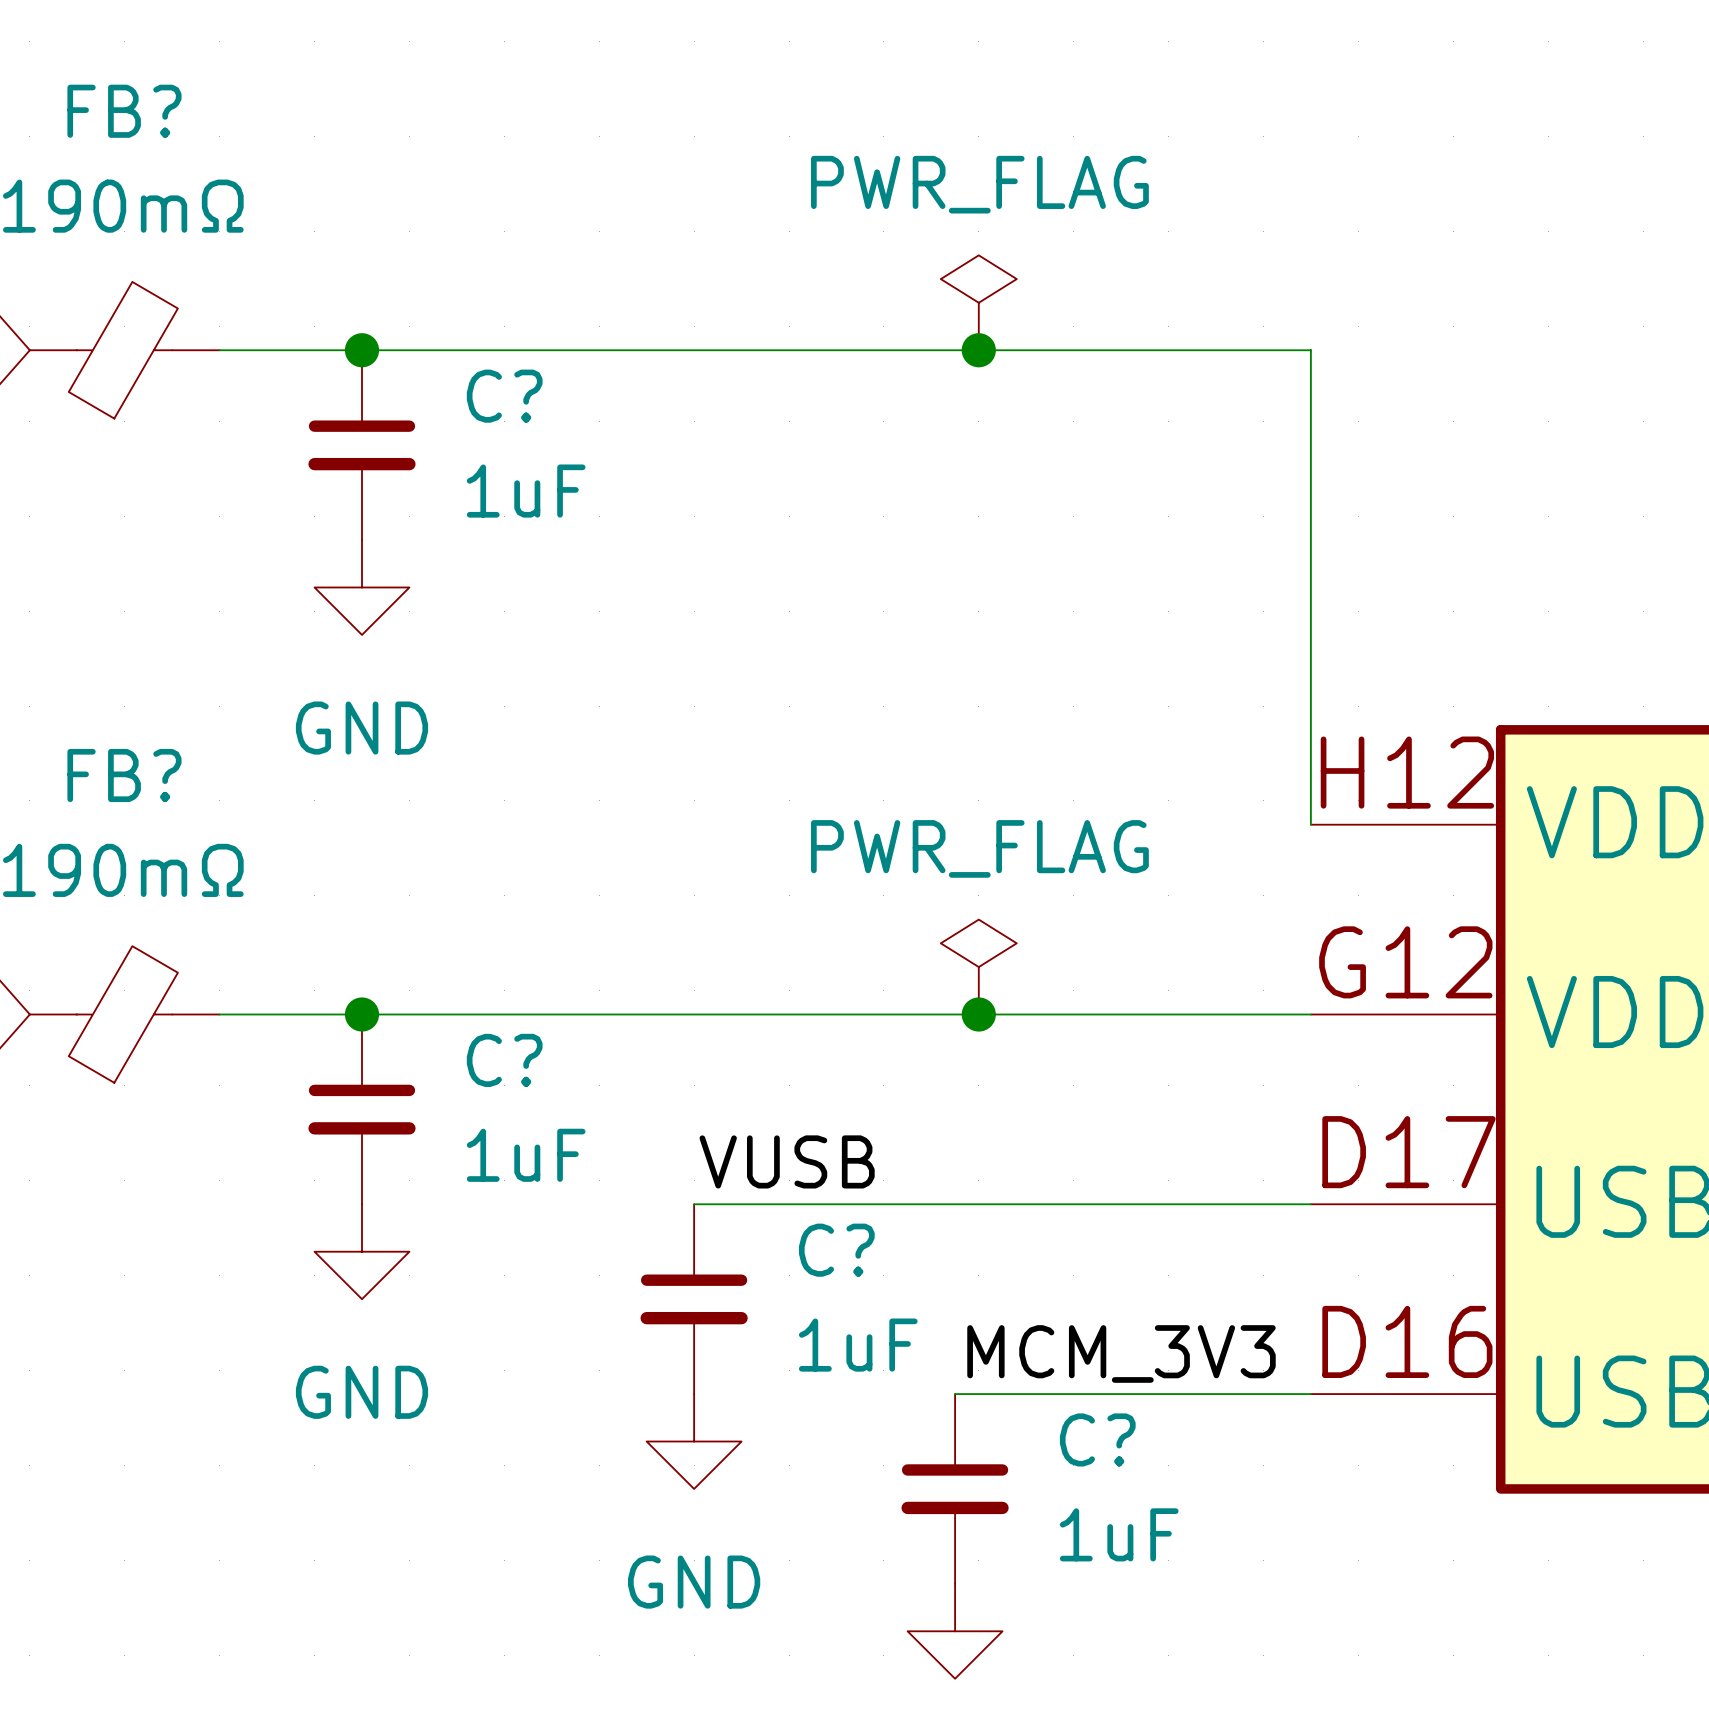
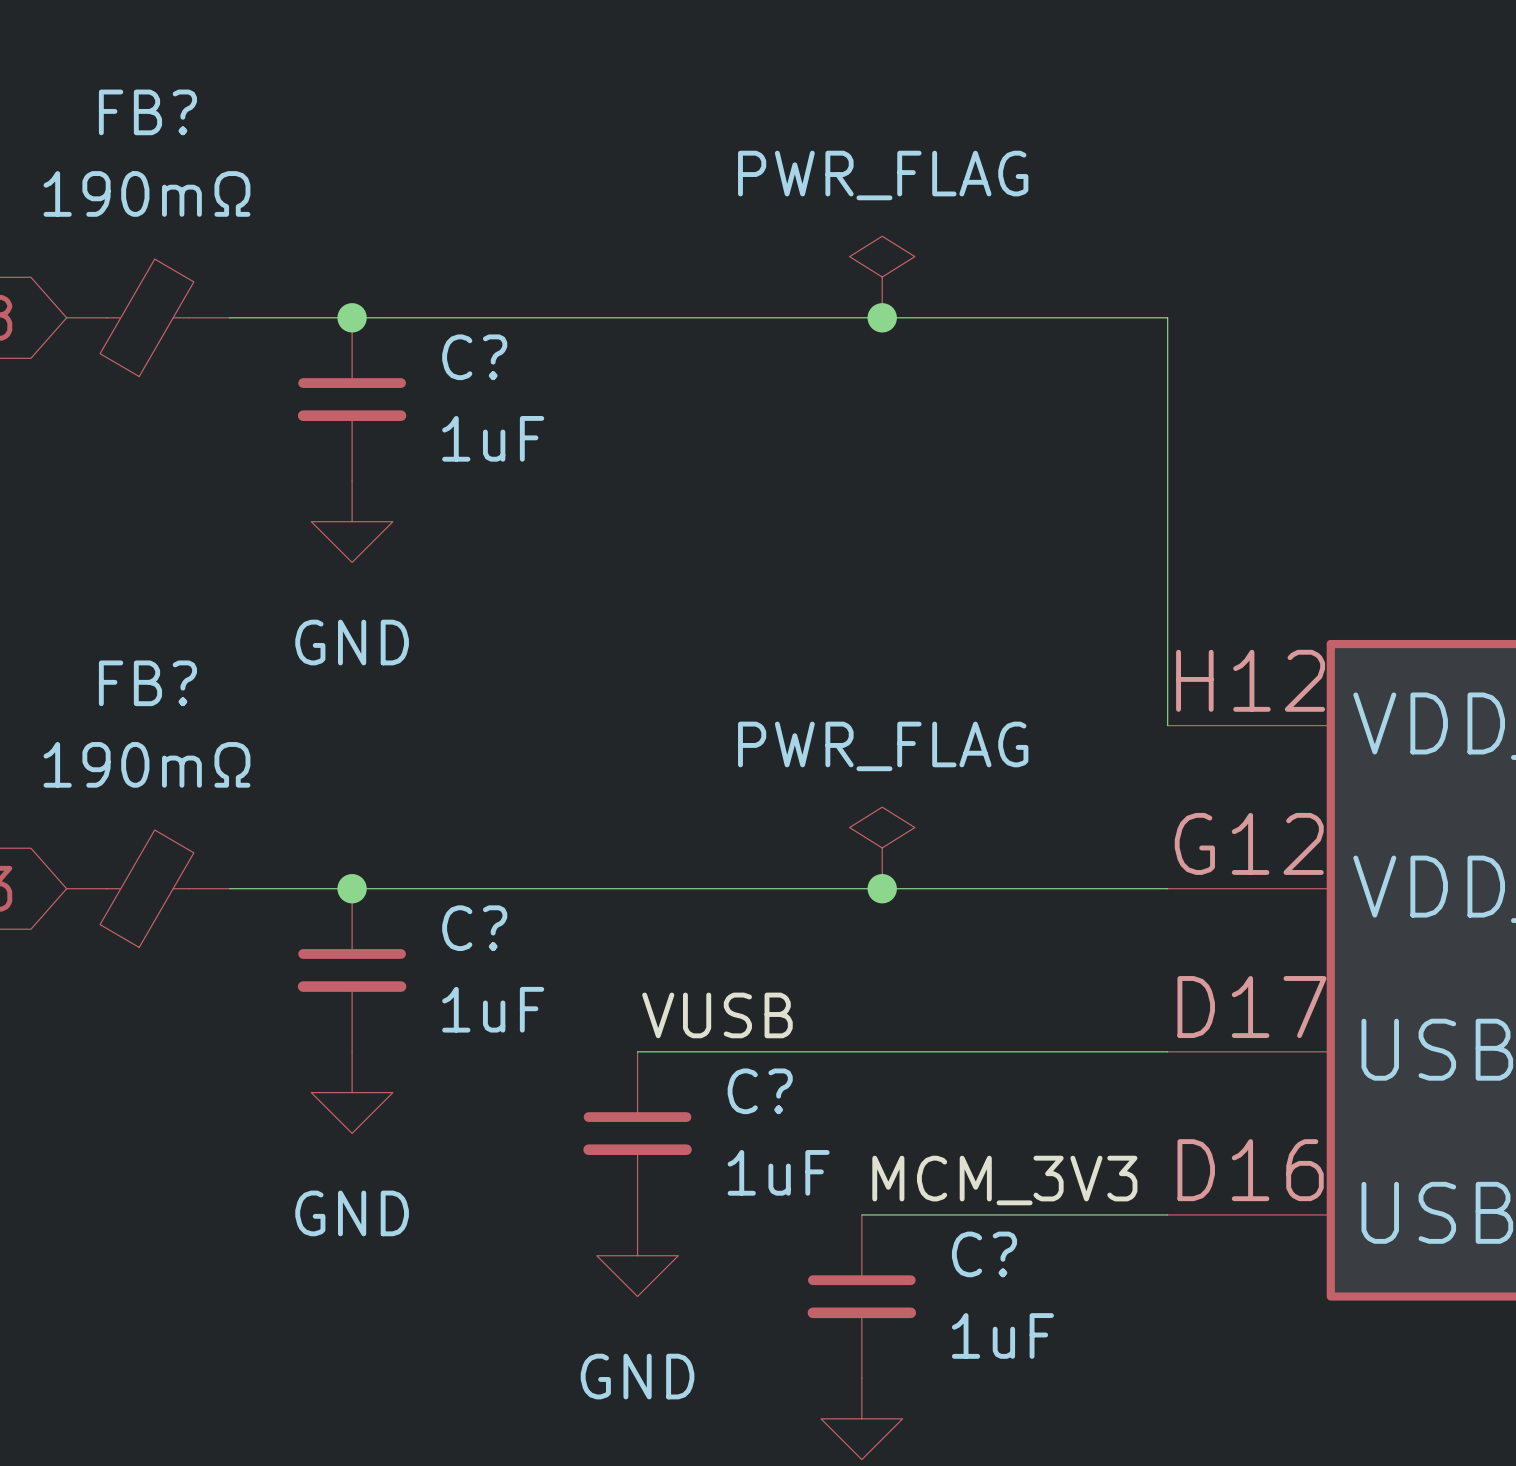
C? symbol: [308, 350, 416, 541] -> [297, 317, 407, 481]
C? symbol: [308, 1014, 416, 1205] -> [297, 888, 407, 1052]
C? symbol: [640, 1204, 748, 1395] -> [583, 1051, 692, 1215]
C? symbol: [901, 1394, 1009, 1584] -> [807, 1214, 917, 1379]

